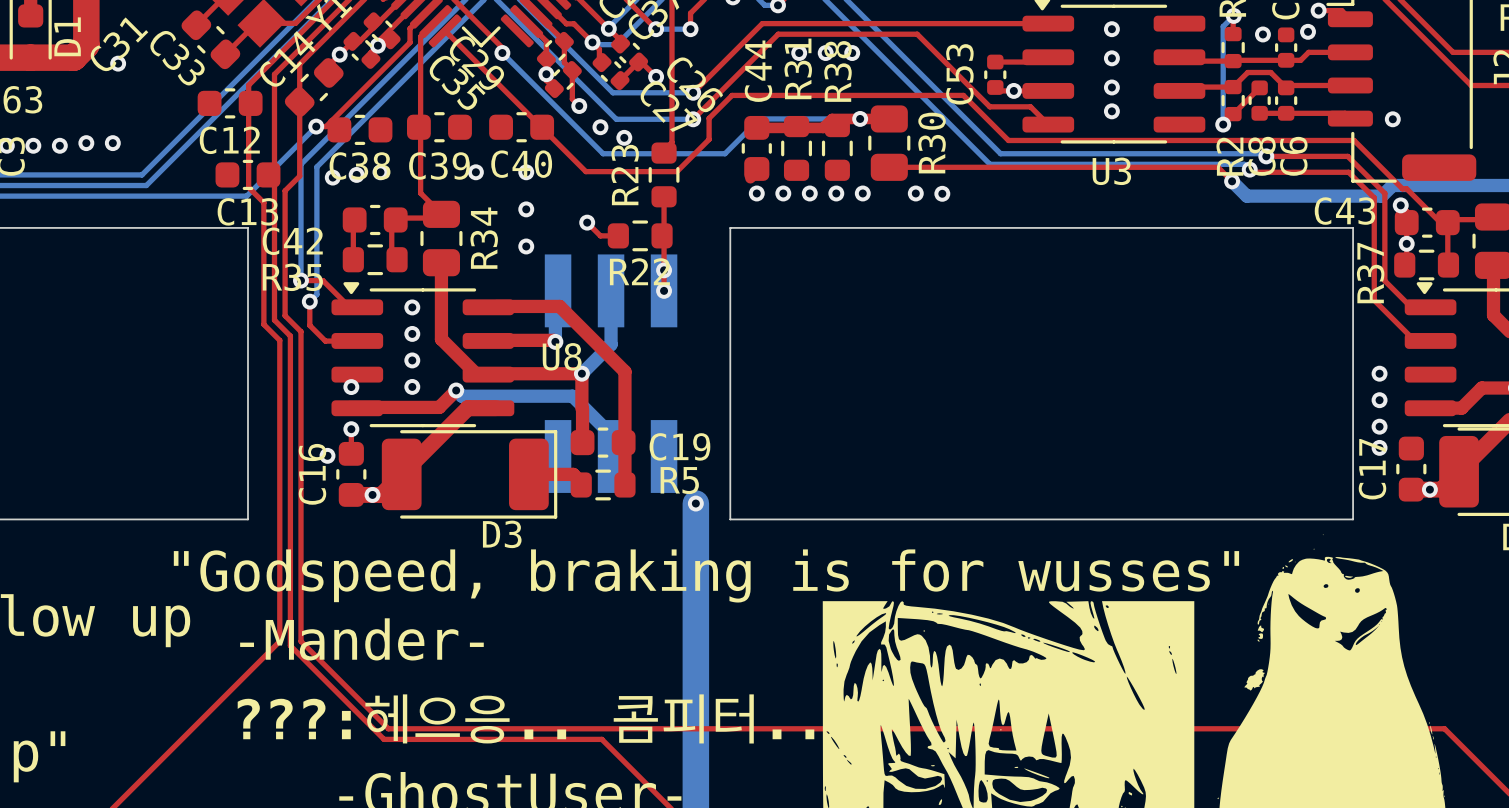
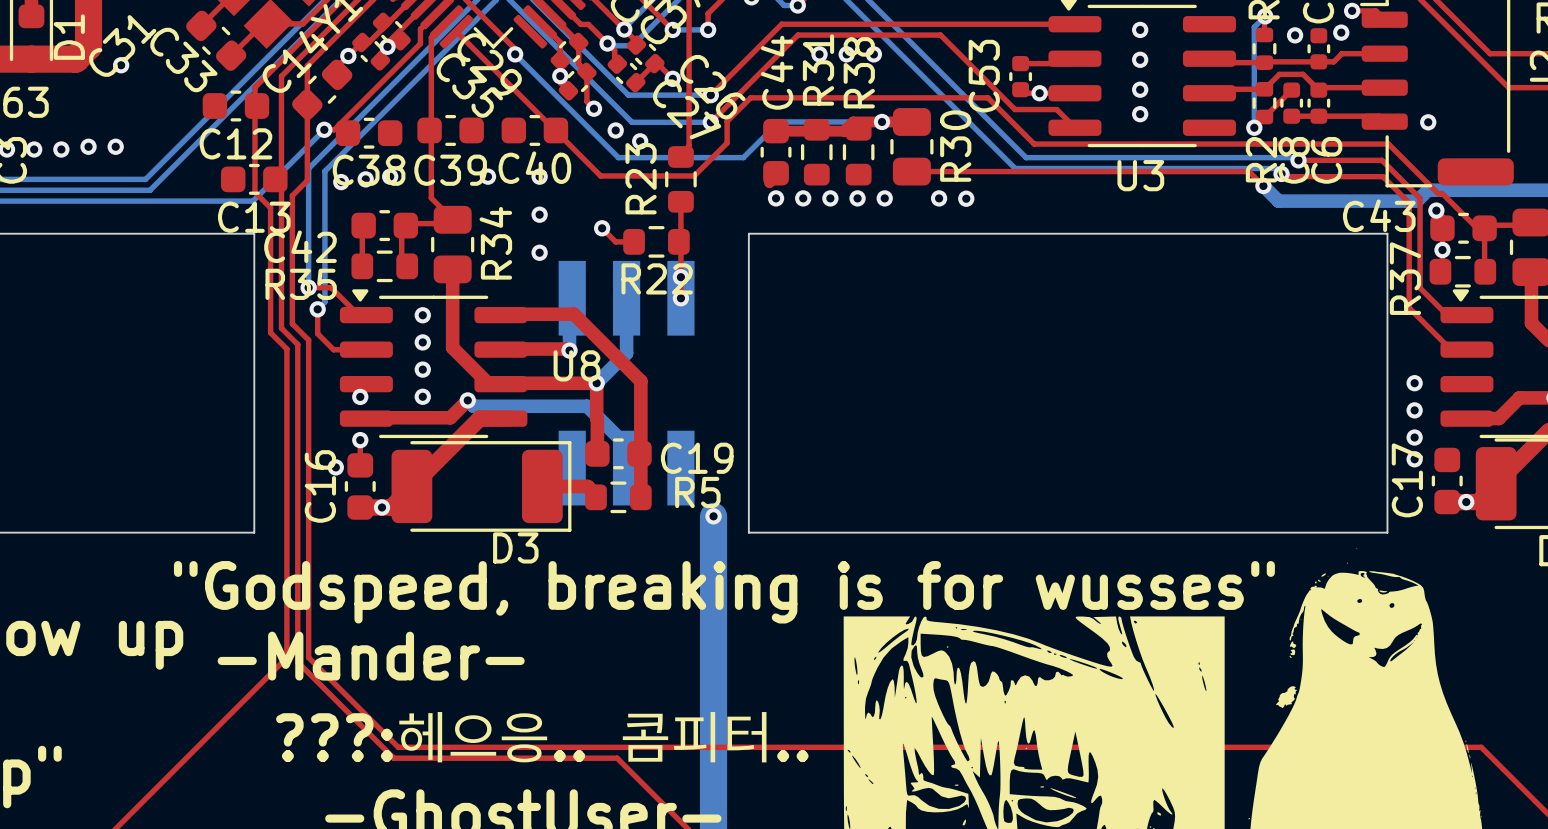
text: "Godspeed, braking is for wusses" (706, 575) -> "Godspeed, breaking is for wusses" (724, 592)

